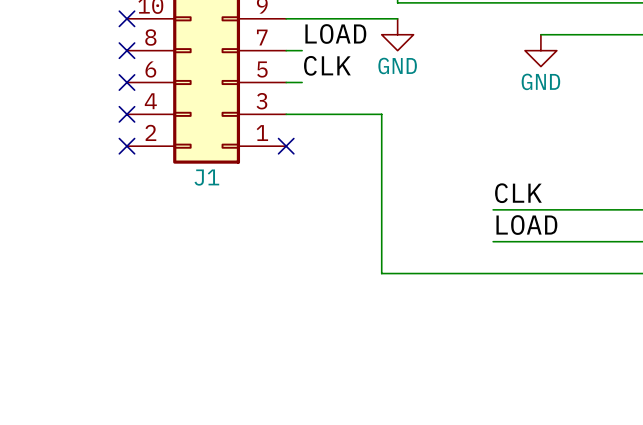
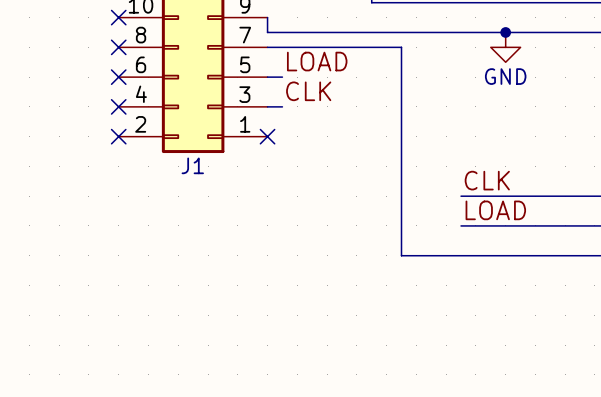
wire: (286, 18) (397, 18) -> (267, 17) (267, 32) (505, 32)
label: LOAD (335, 33) -> none
power symbol: GND (397, 34) -> none
junction: none -> (505, 32)
label: CLK (327, 65) -> LOAD (317, 61)
label: none -> CLK (308, 91)
wire: (302, 114) (381, 114) (381, 273) (429, 273) -> (282, 47) (401, 47) (401, 255)

